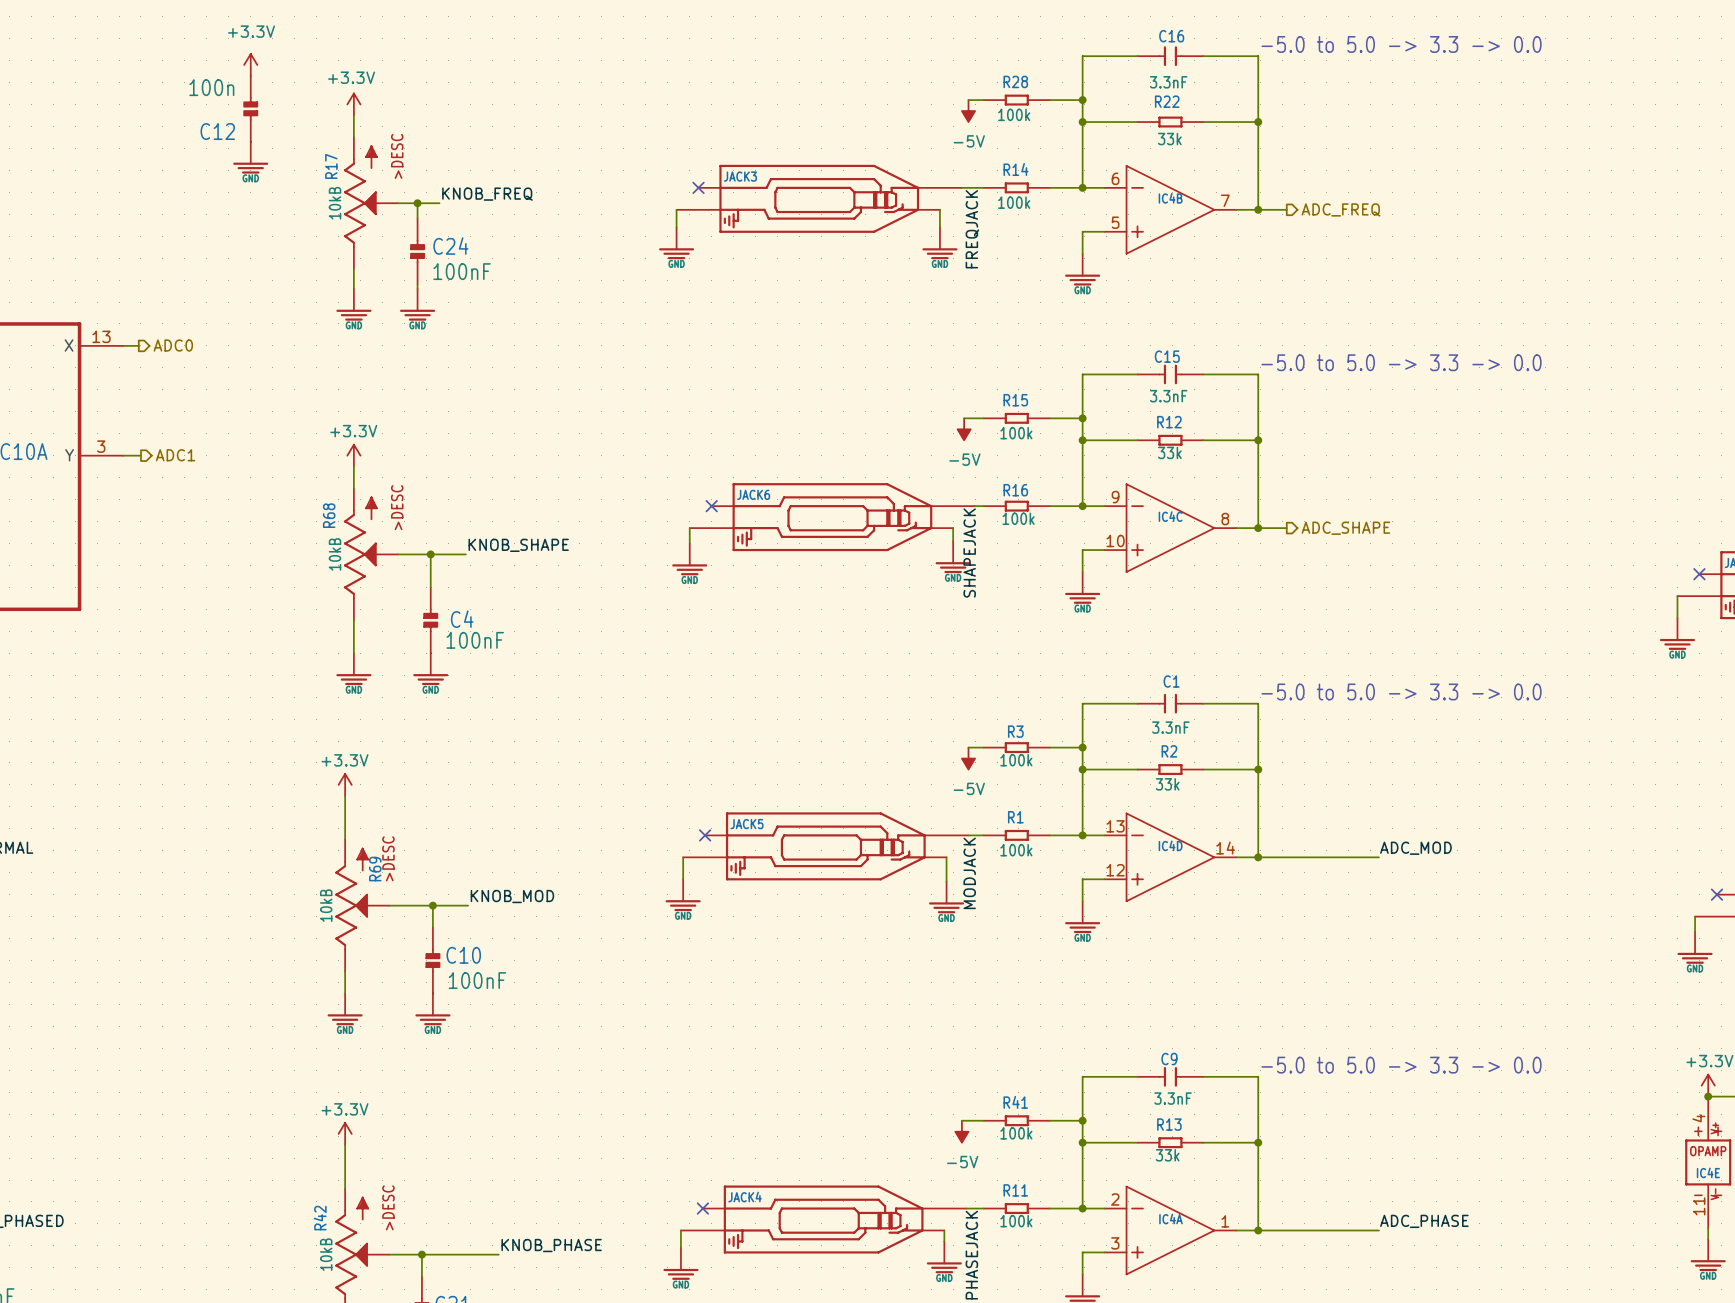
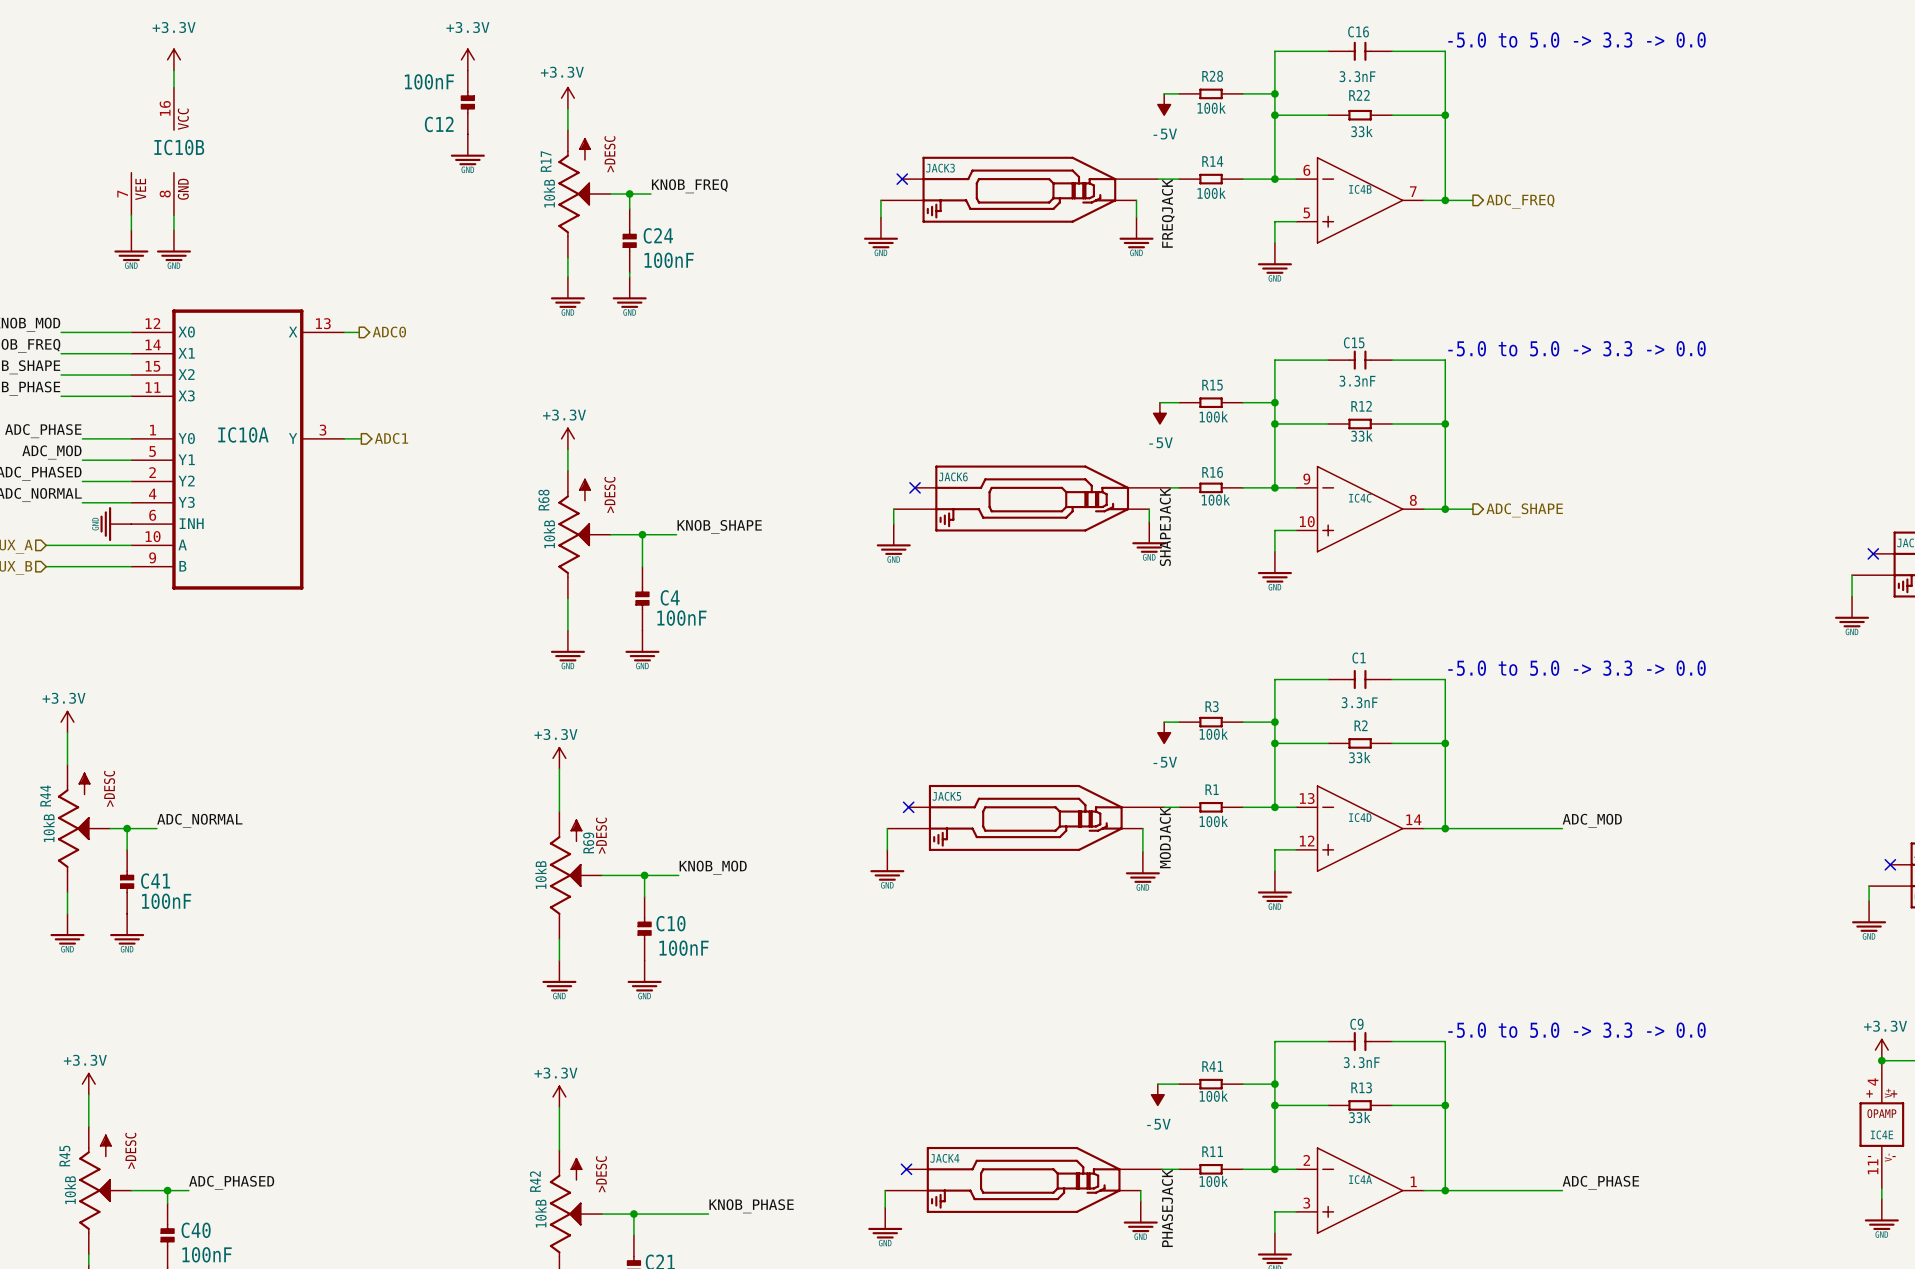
C12 value: 100n (211, 87) -> 100nF (429, 81)

